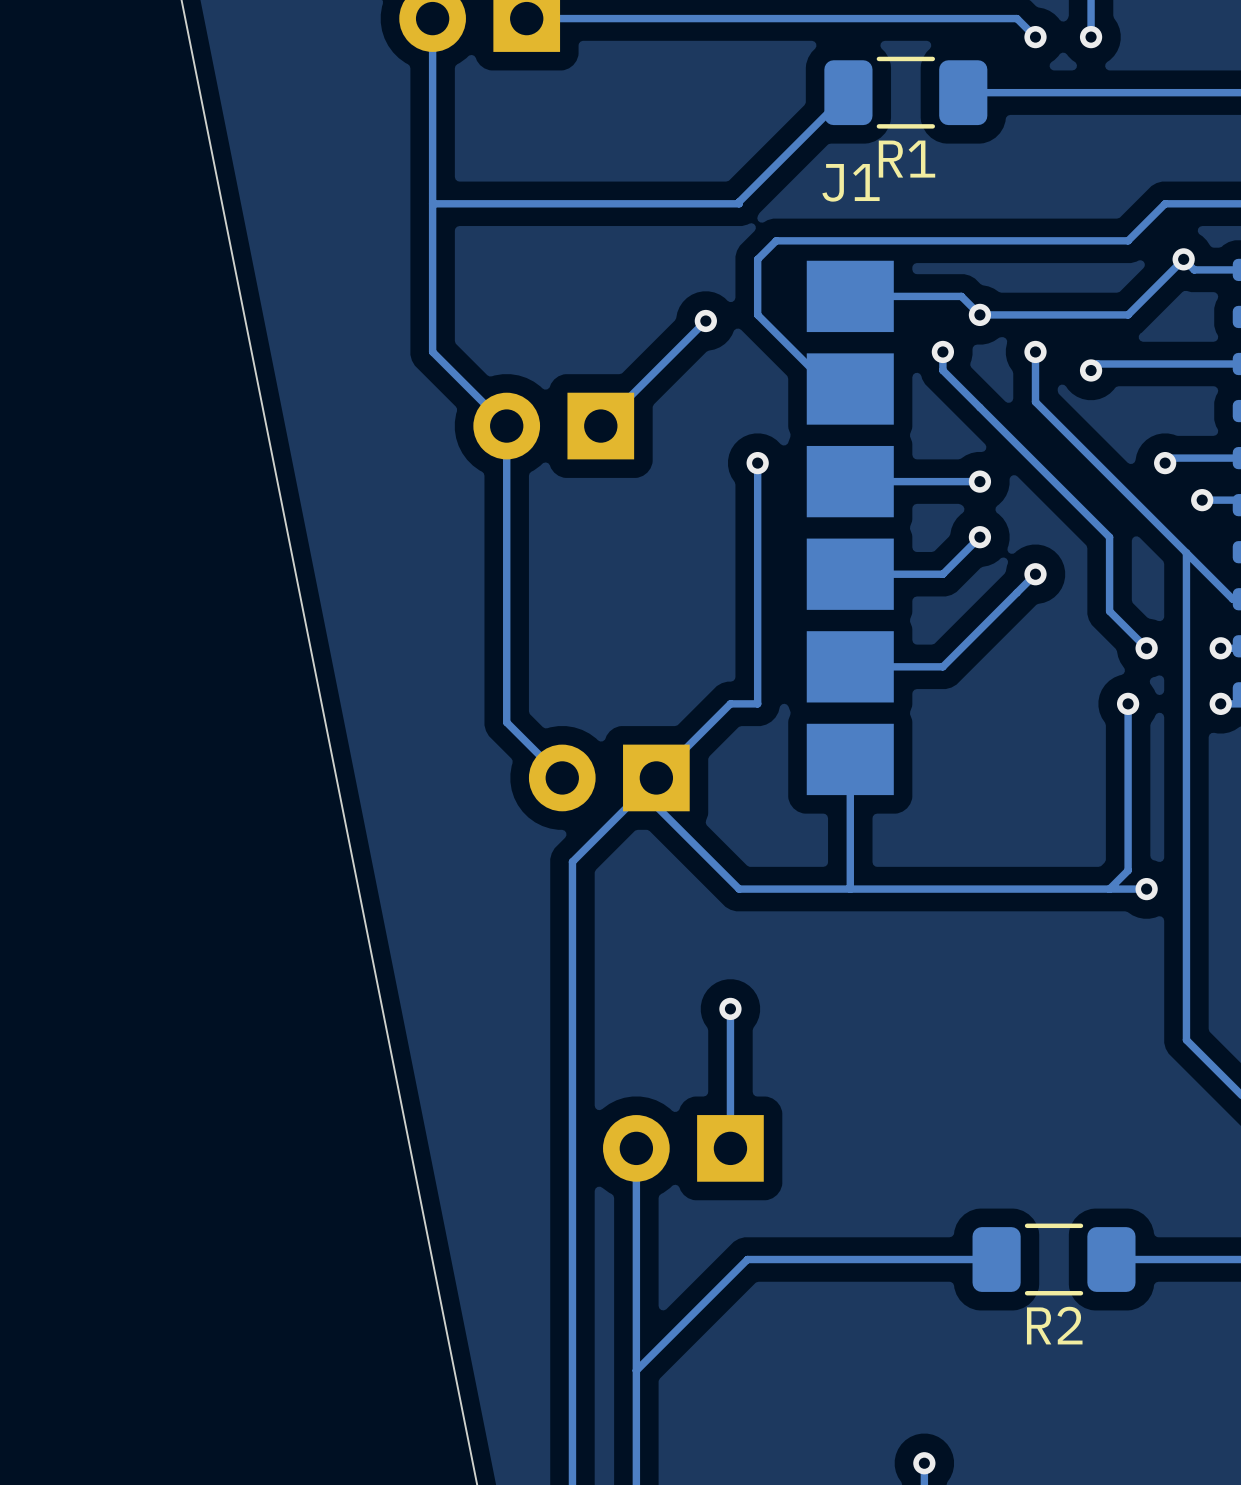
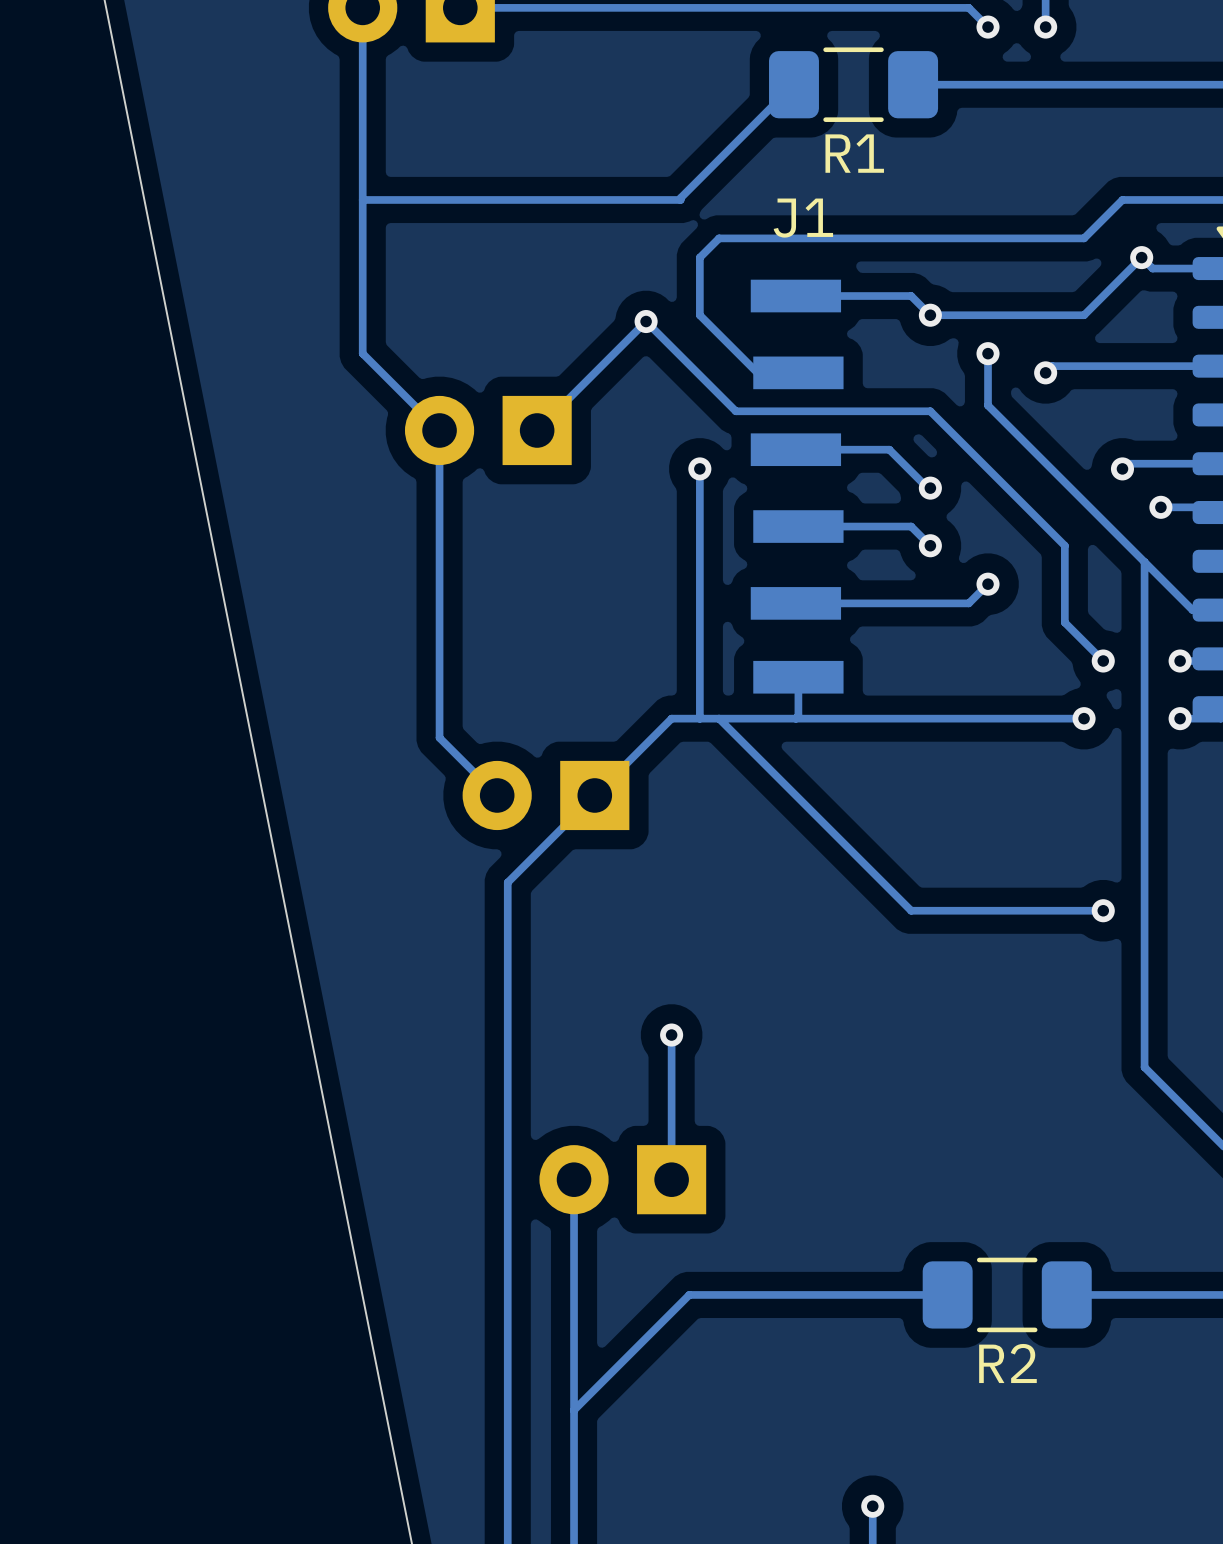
J1 name position: J1 (851, 182) -> J1 (803, 218)
J1 footprint: [806, 260, 894, 796] -> [750, 279, 844, 694]
track: (942, 351) (942, 370) (979, 407) -> (646, 321) (735, 411) (930, 411)
via: (942, 351) -> none
track: none -> (795, 449) (889, 449) (929, 489)
track: (979, 481) (850, 481) -> none
track: (979, 537) (942, 574) (850, 574) -> (930, 545) (911, 526) (798, 526)
track: (1016, 592) (942, 666) (850, 666) -> (968, 603) (795, 603)
track: none -> (798, 677) (798, 716) (795, 718)
track: (1128, 703) (1128, 870) (1109, 889) -> (1084, 718) (699, 718)
track: (850, 759) (850, 889) -> none
track: (656, 777) (656, 806) (739, 889) (961, 889) -> (719, 718) (911, 910)

